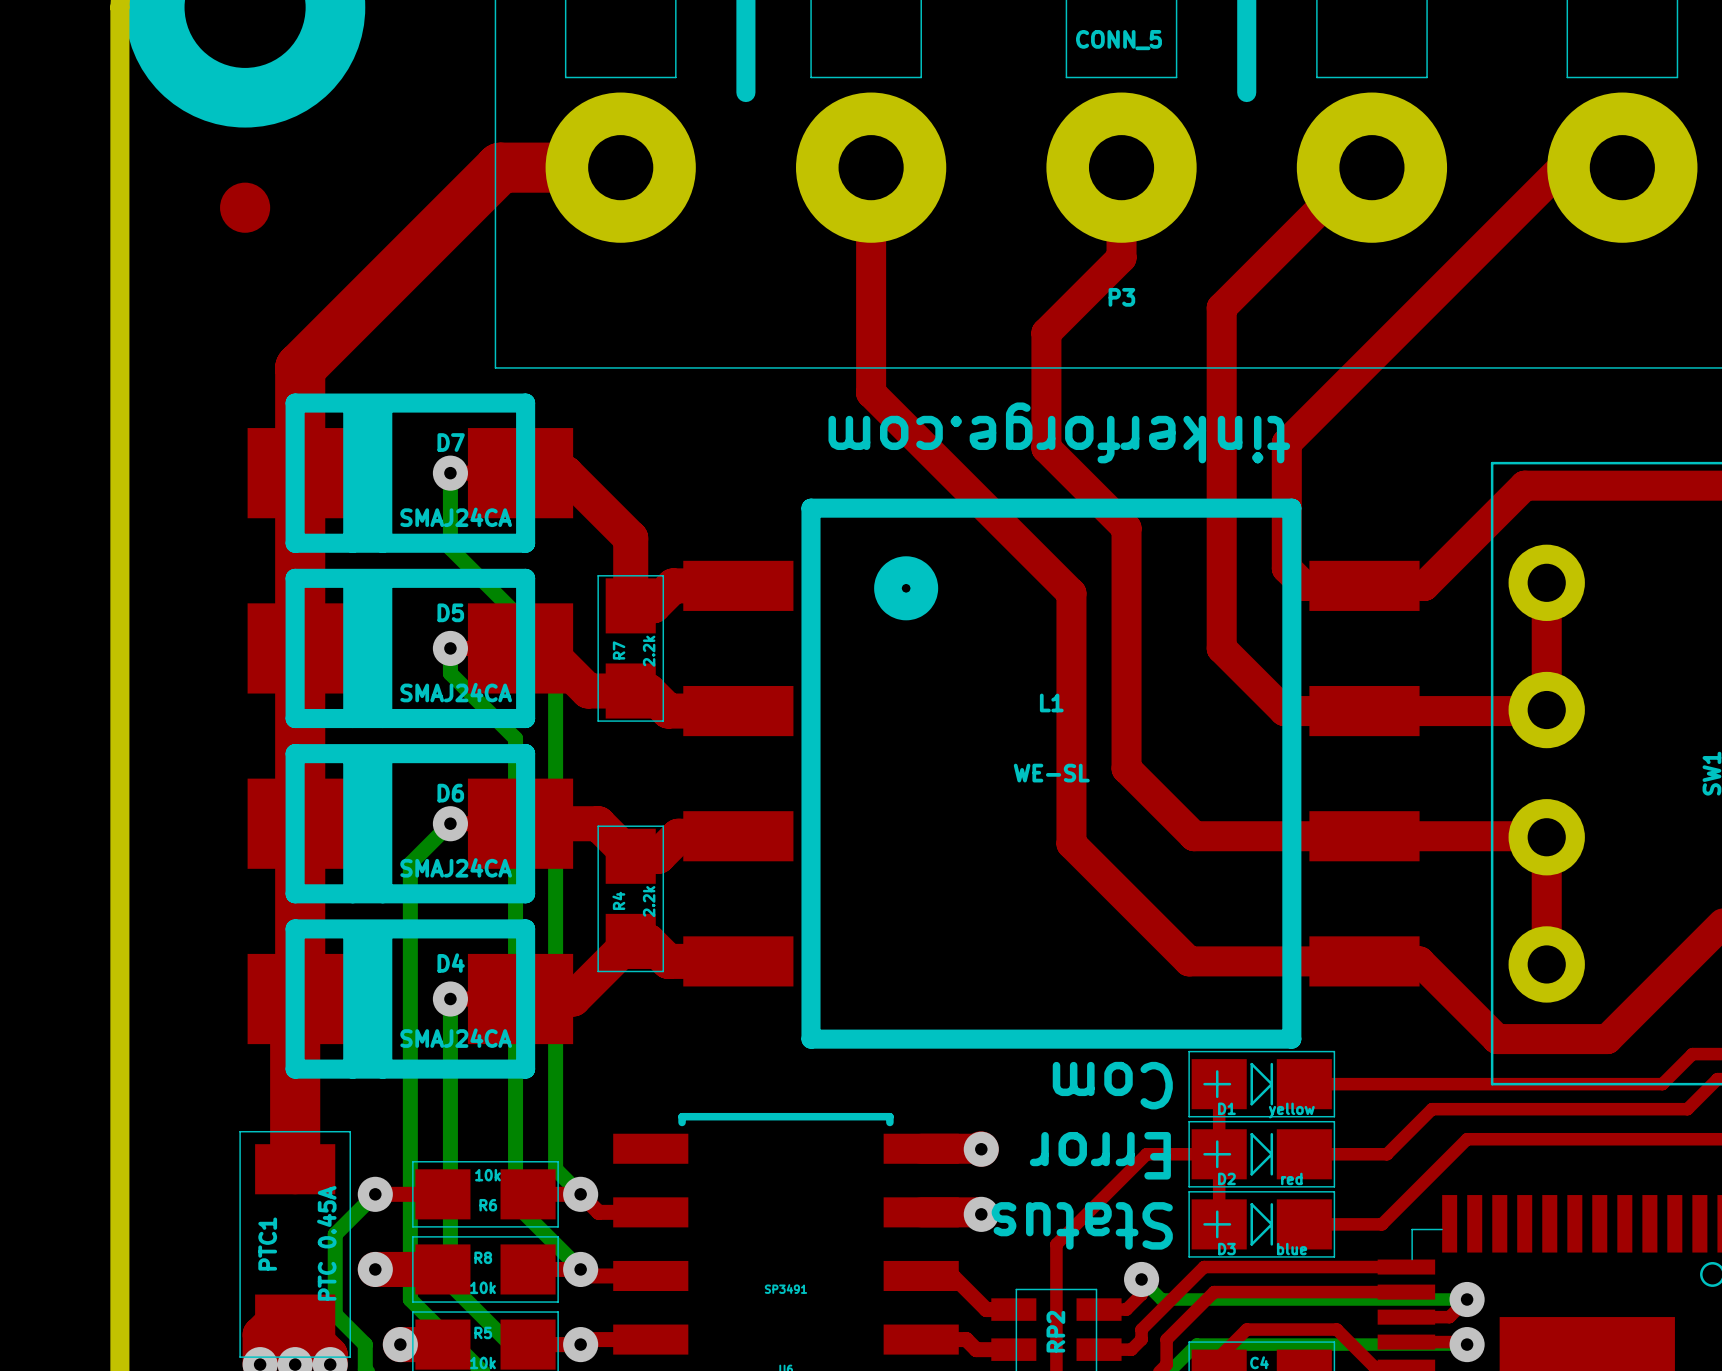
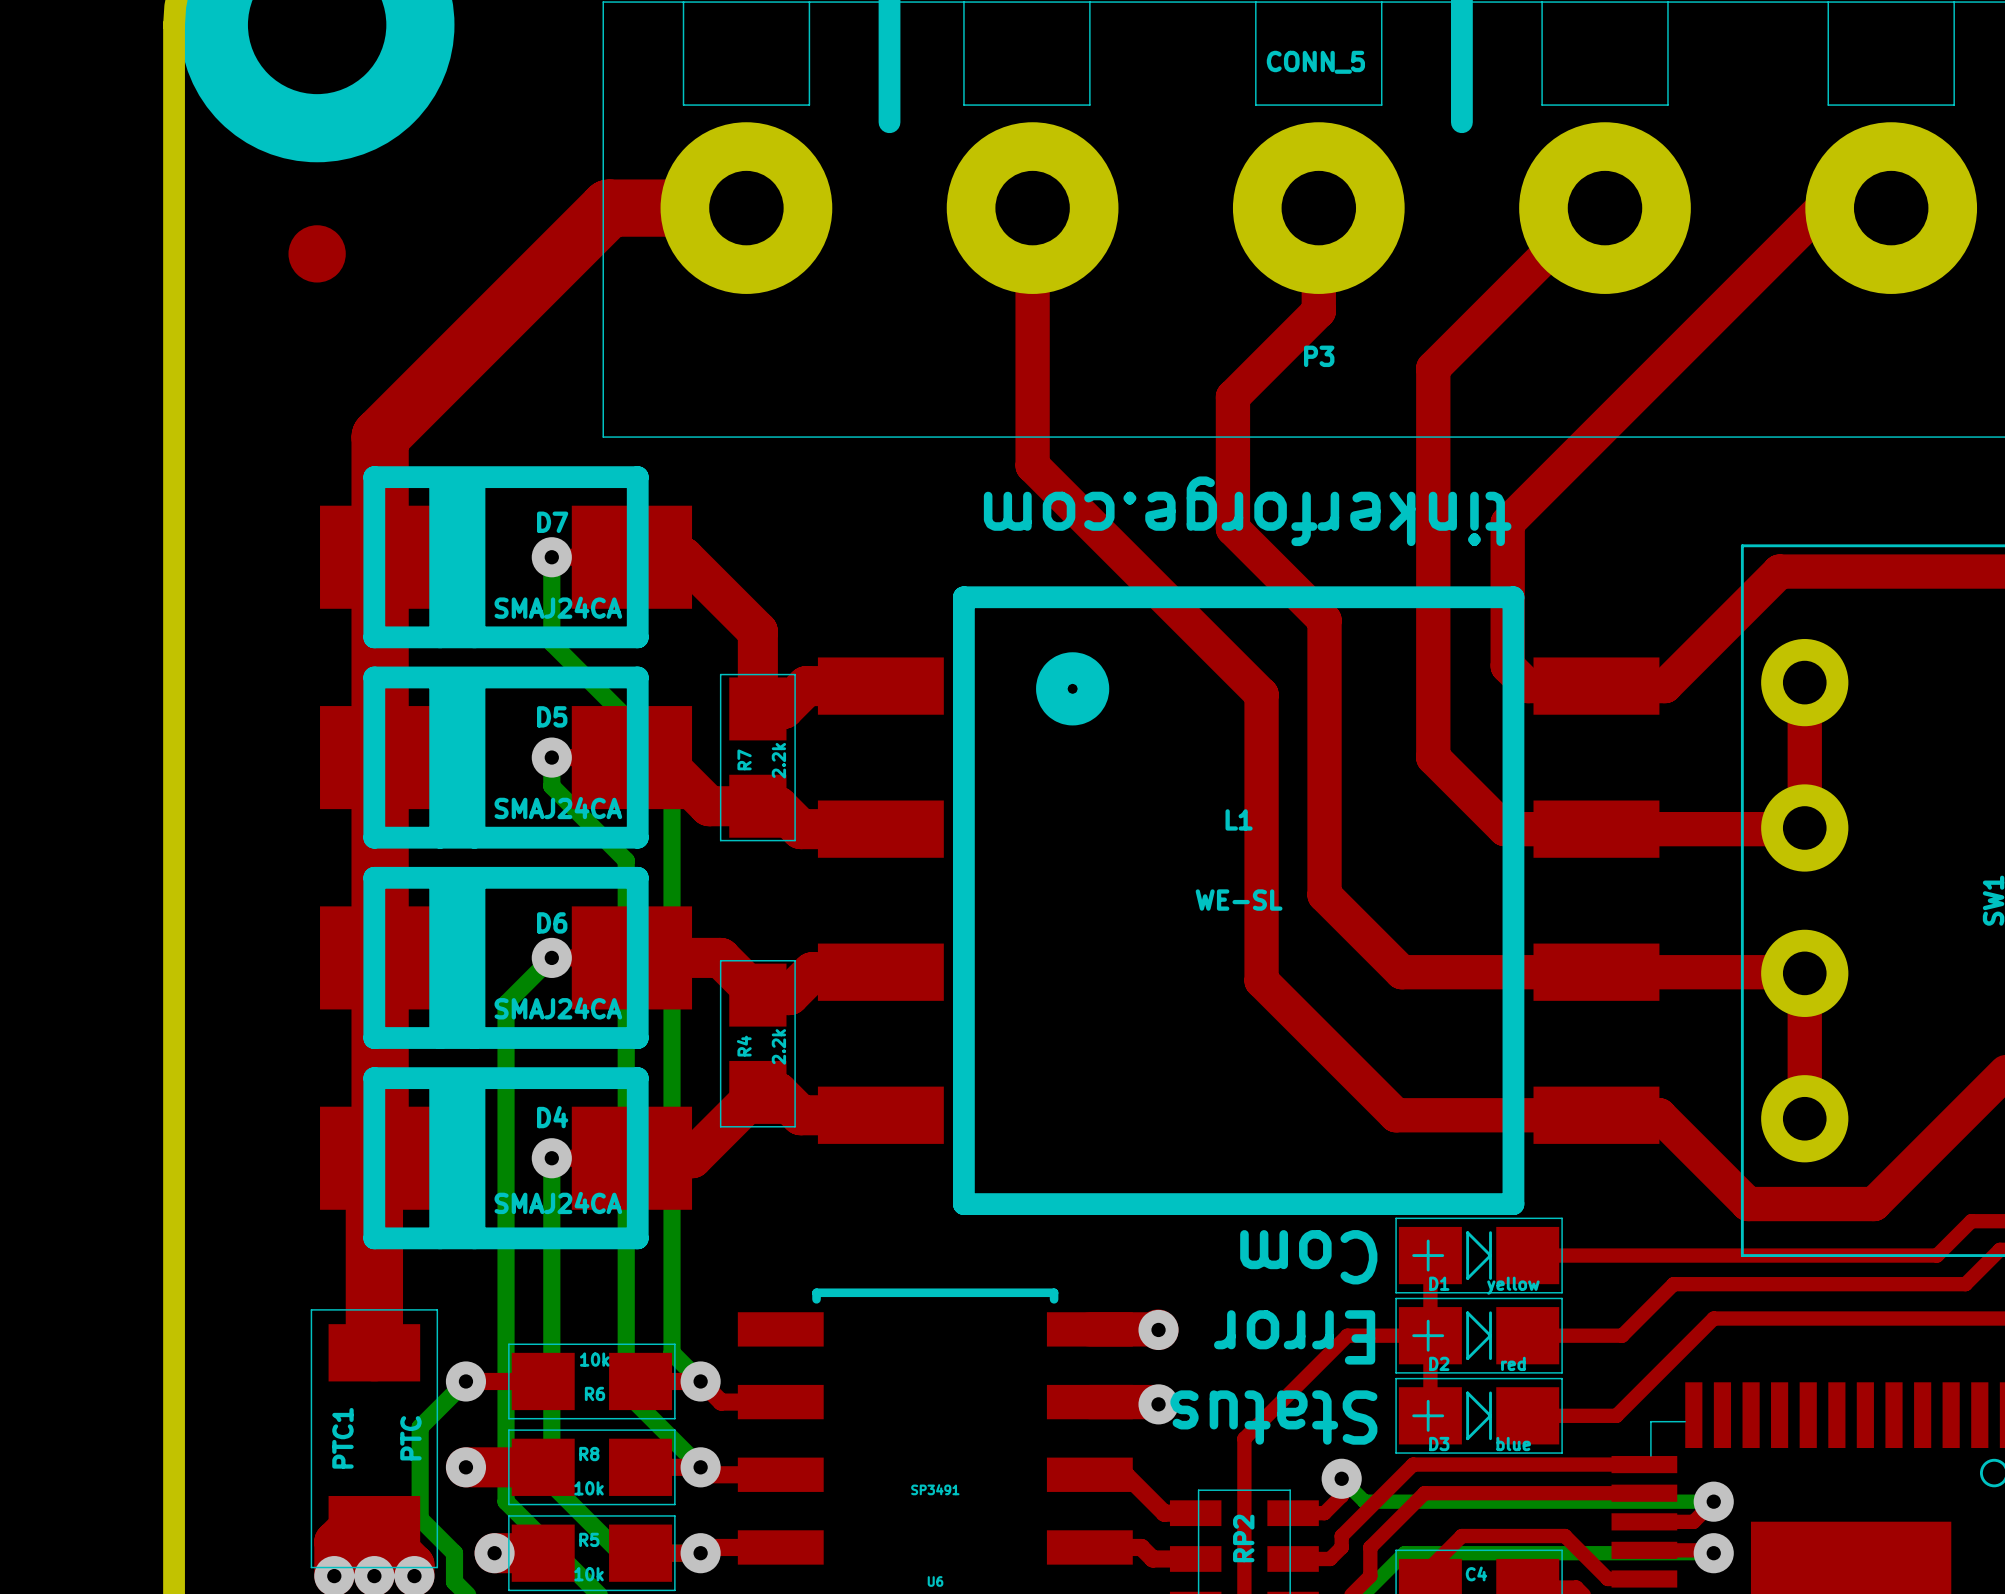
PTC1 value: PTC 0.45A (326, 1243) -> PTC (410, 1438)

